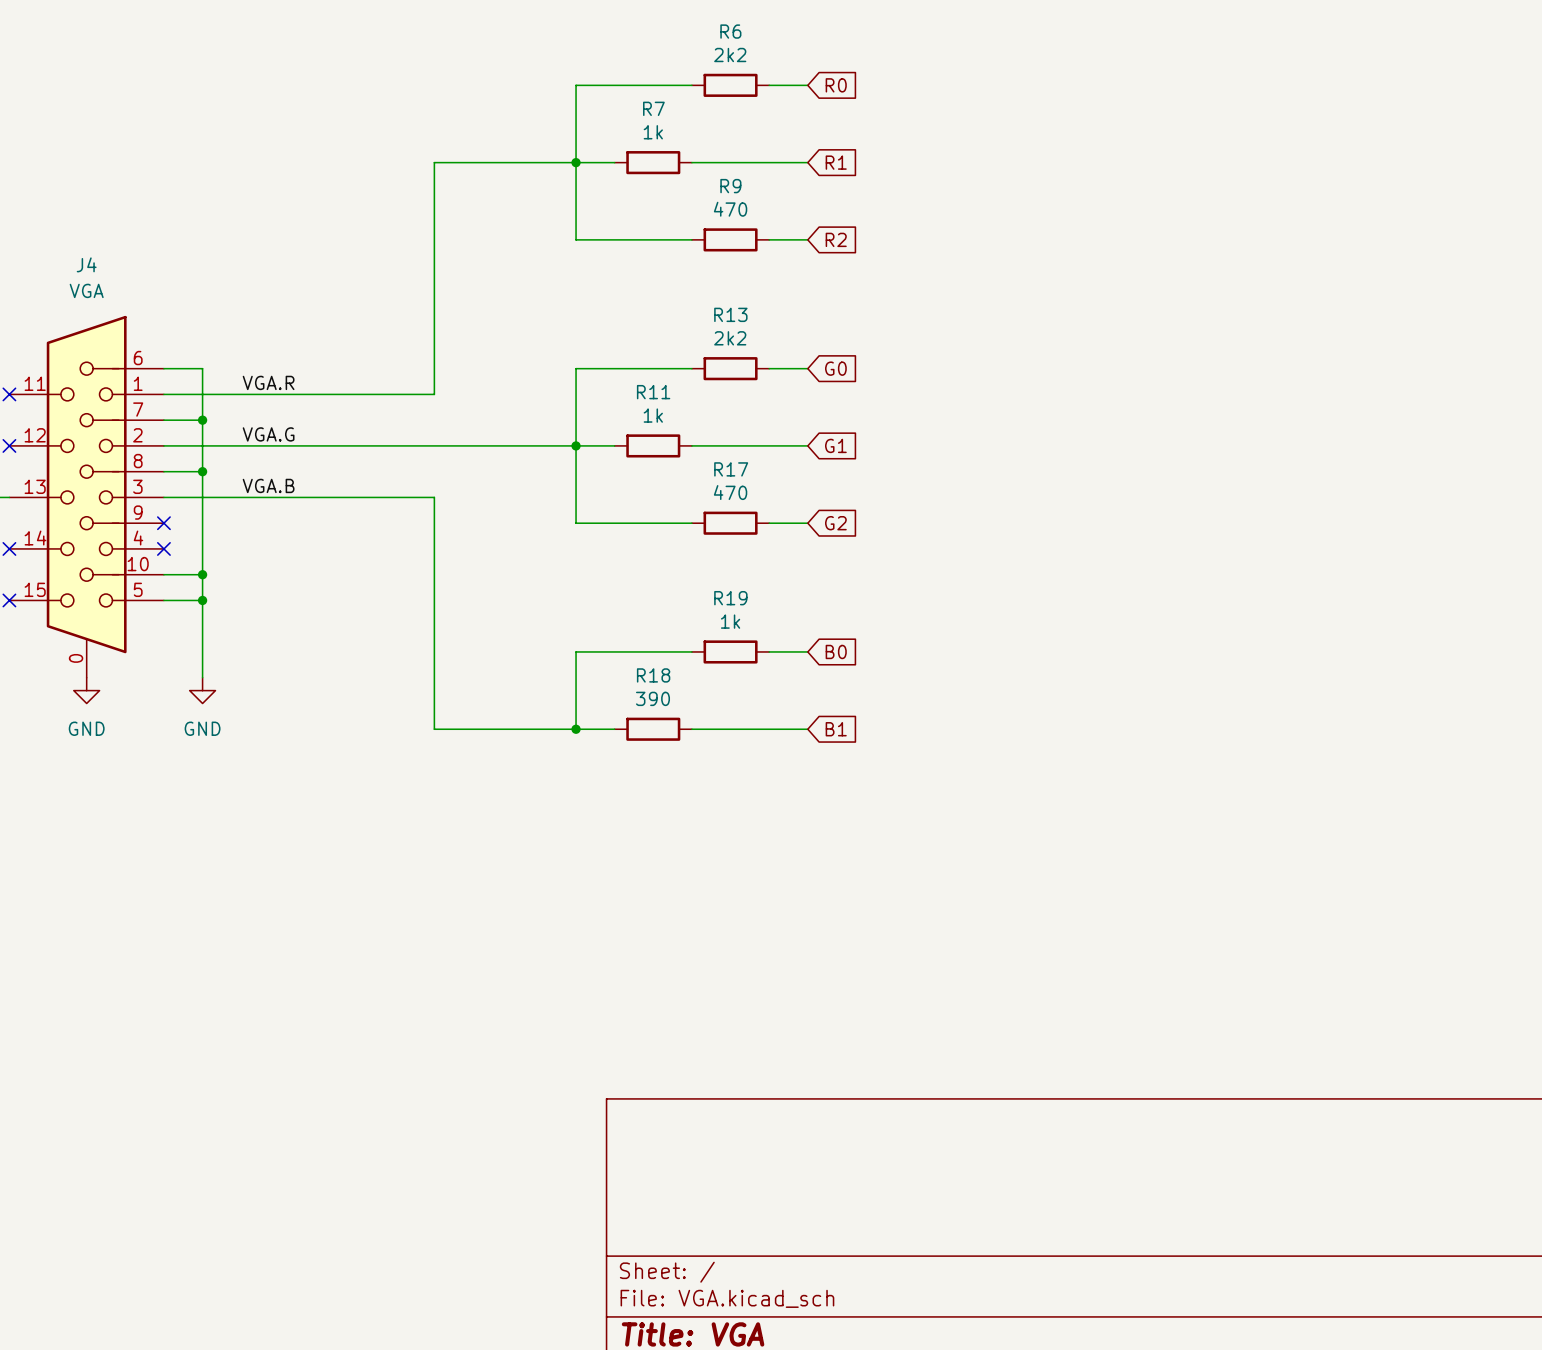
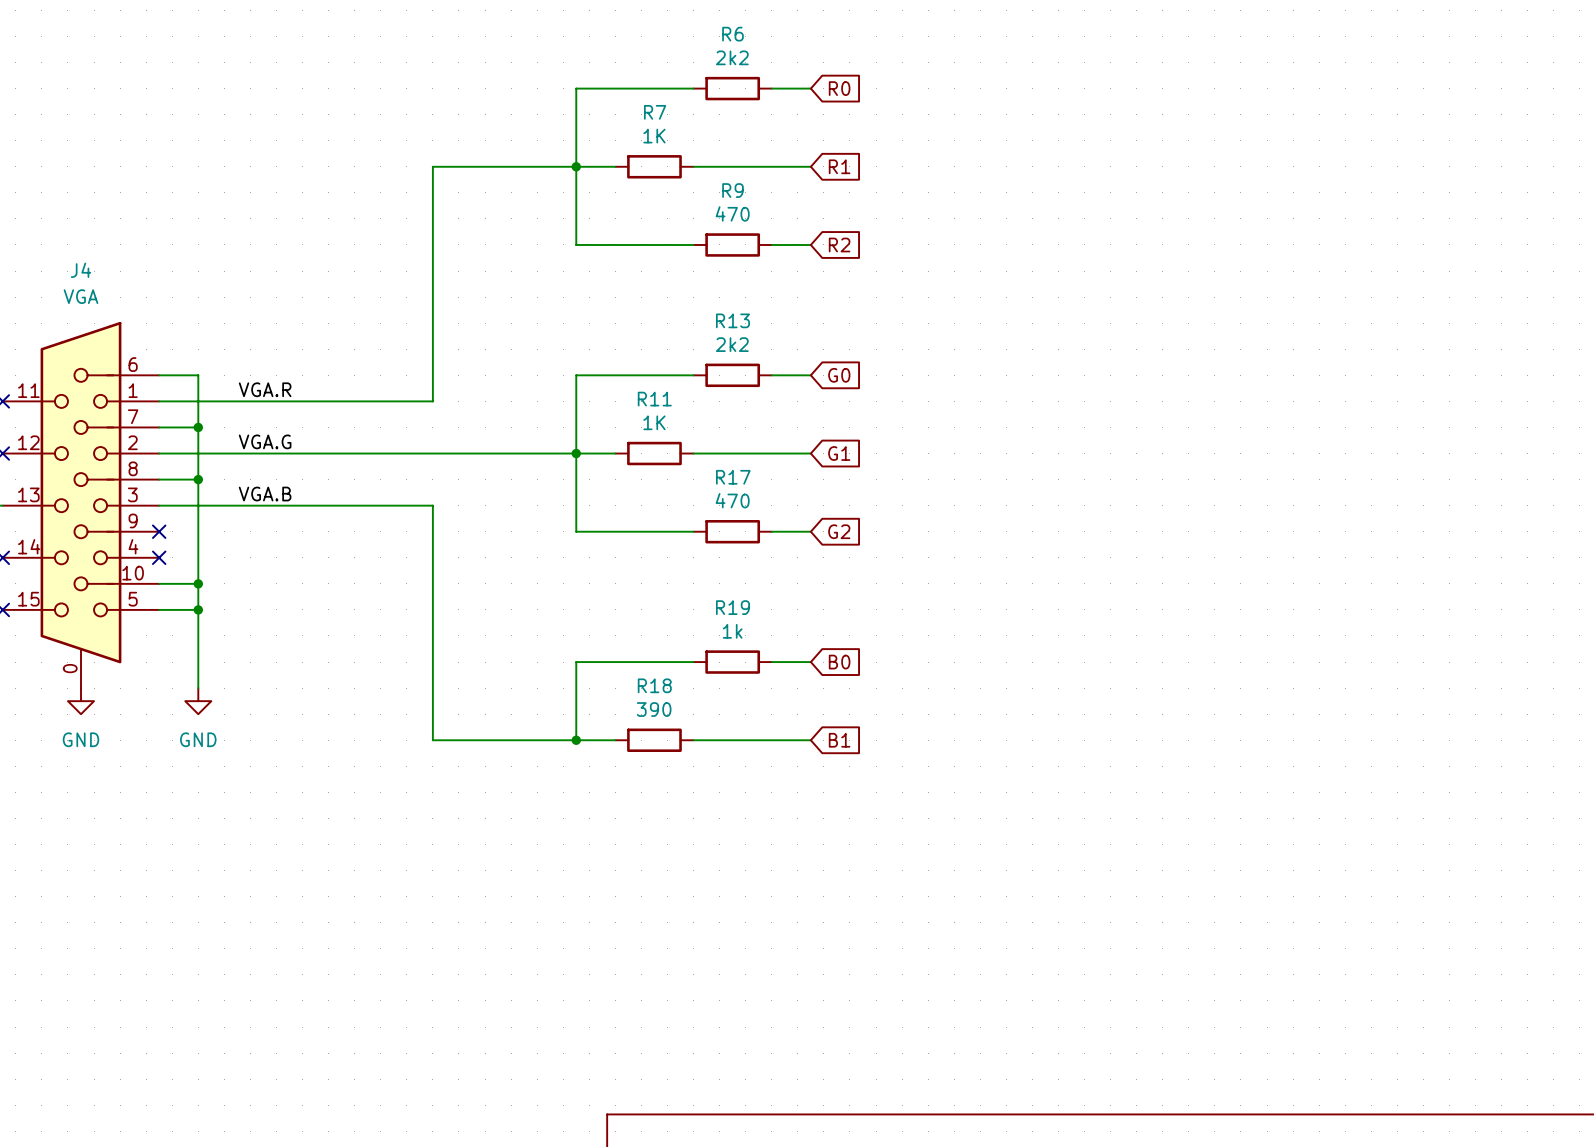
R7 value: 1k (653, 132) -> 1K (654, 136)
R11 value: 1k (653, 415) -> 1K (654, 422)

